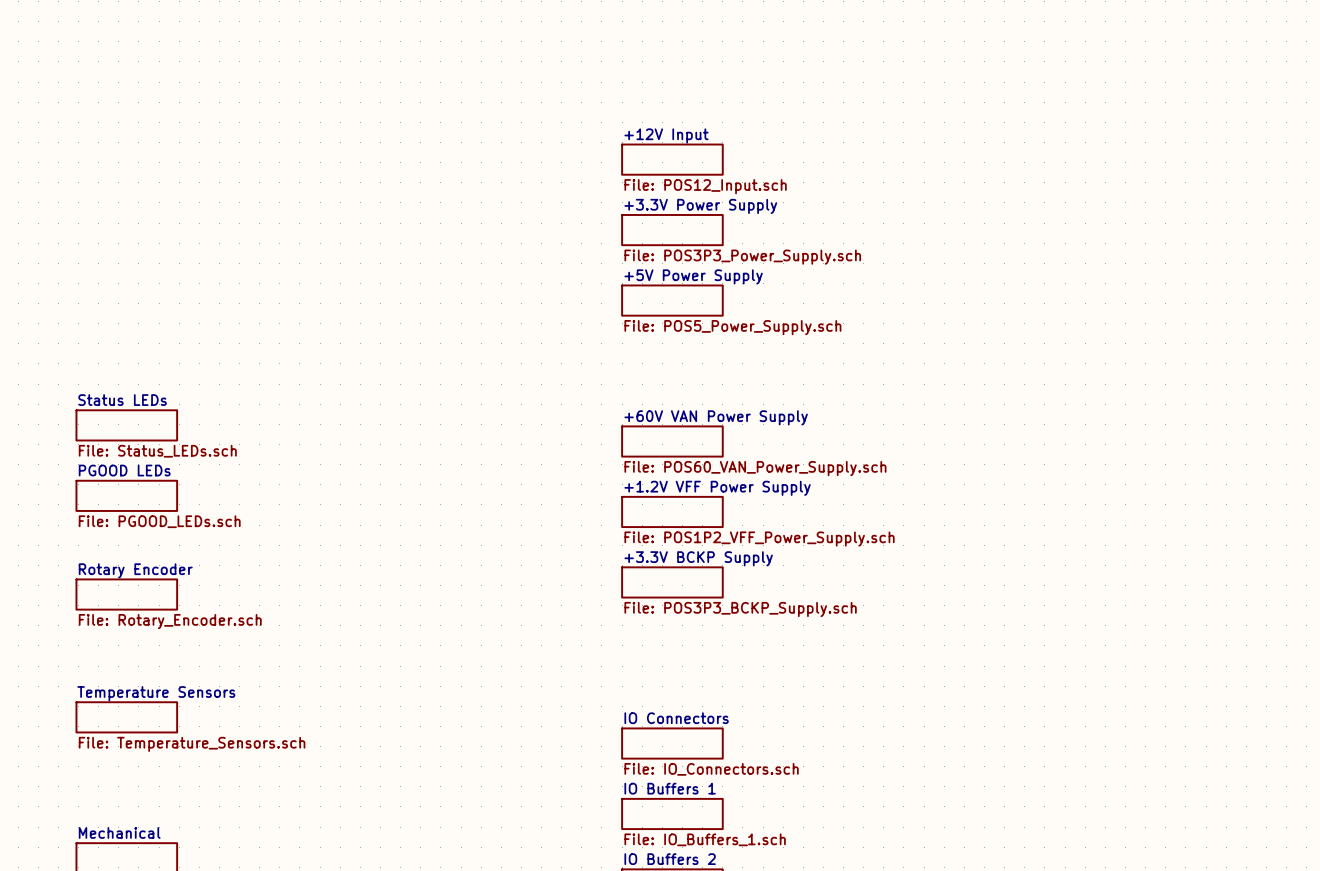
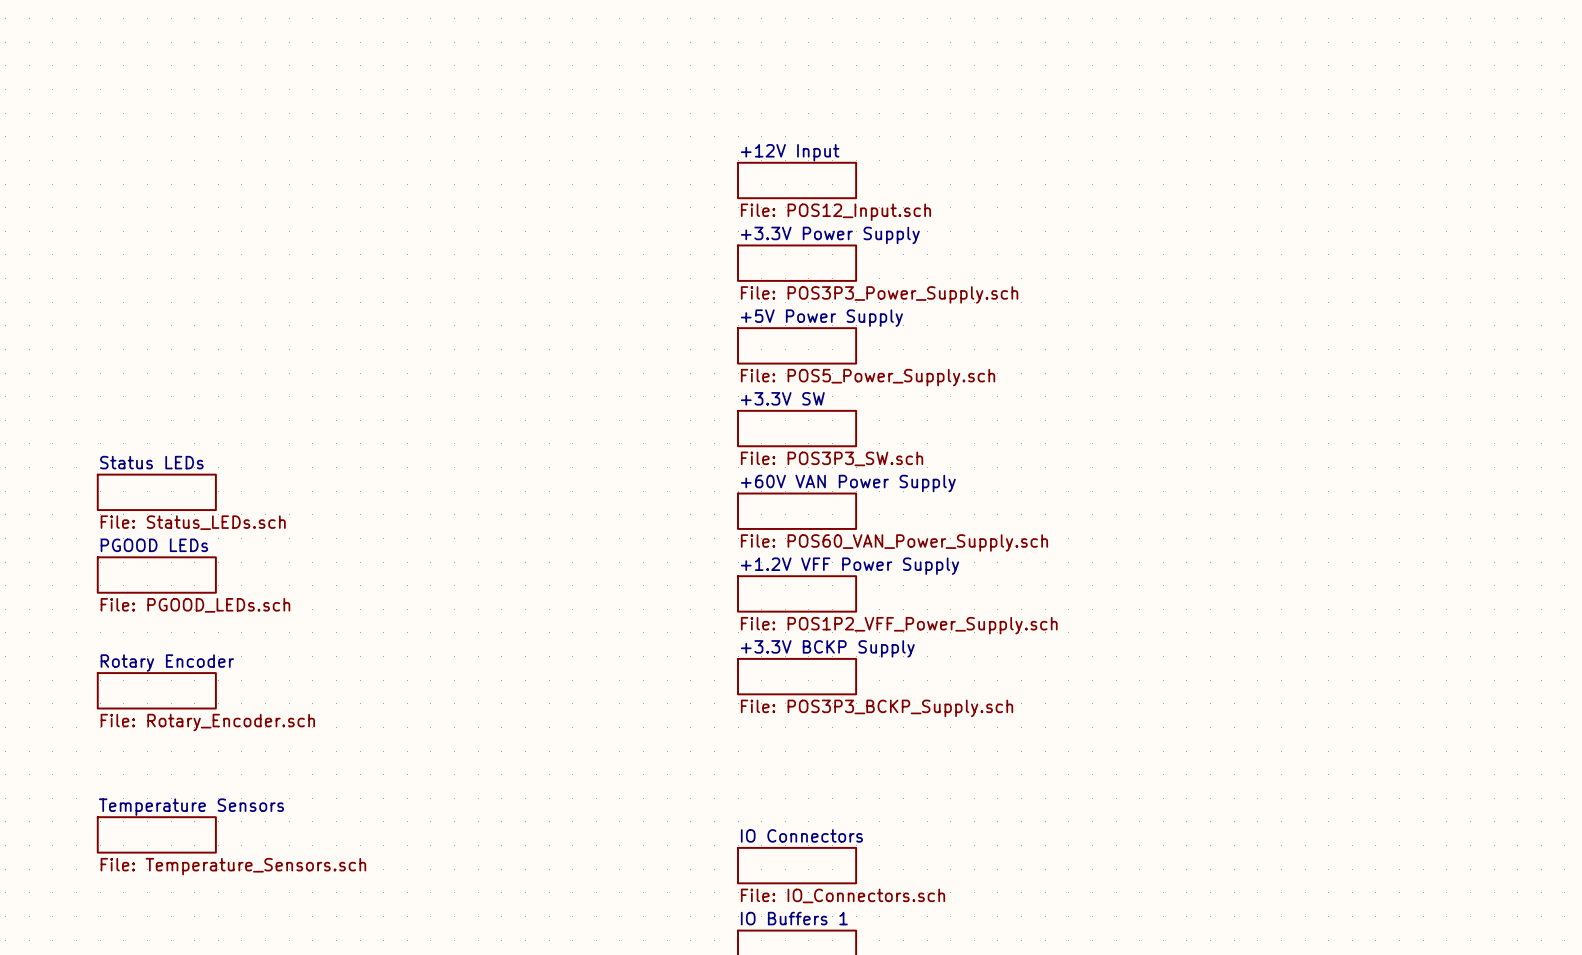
sheet +3.3V SW: none -> File: POS3P3_SW.sch (797, 428)

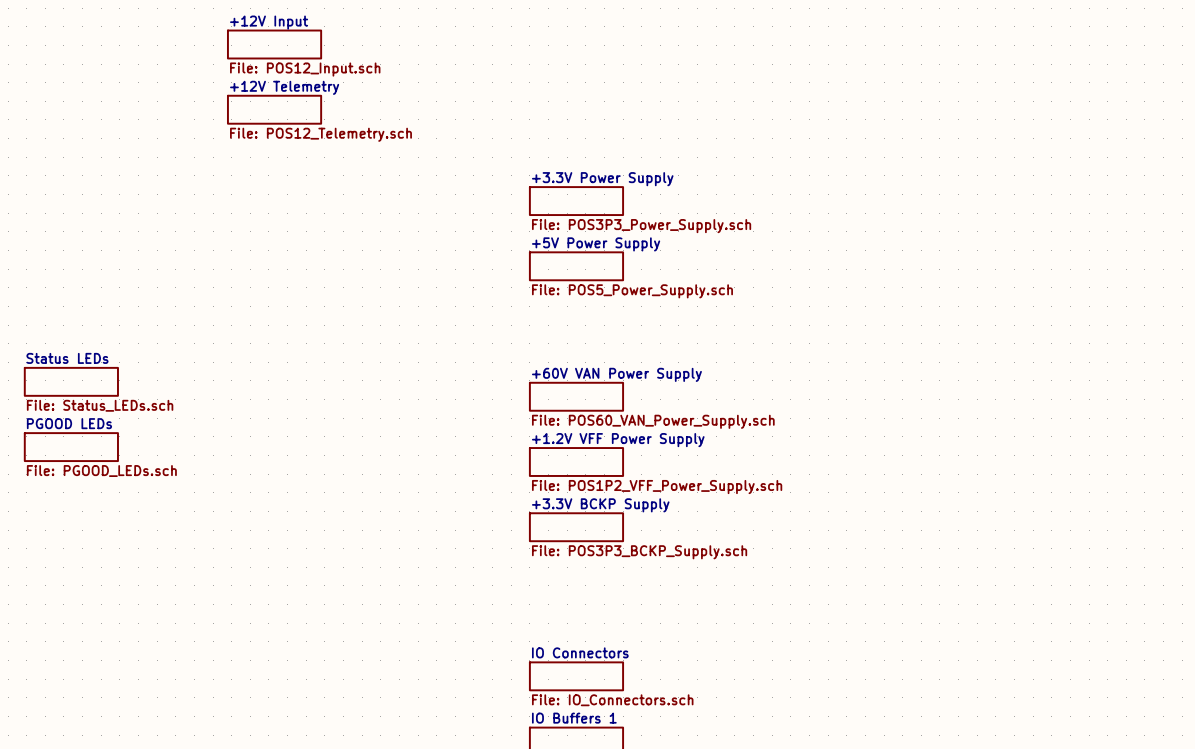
sheet +12V Telemetry: none -> File: POS12_Telemetry.sch (274, 109)
sheet +12V Input position: (797, 180) -> (274, 44)
sheet +3.3V SW: File: POS3P3_SW.sch (797, 428) -> none
sheet Rotary Encoder: File: Rotary_Encoder.sch (156, 690) -> none
sheet Temperature Sensors: File: Temperature_Sensors.sch (156, 834) -> none

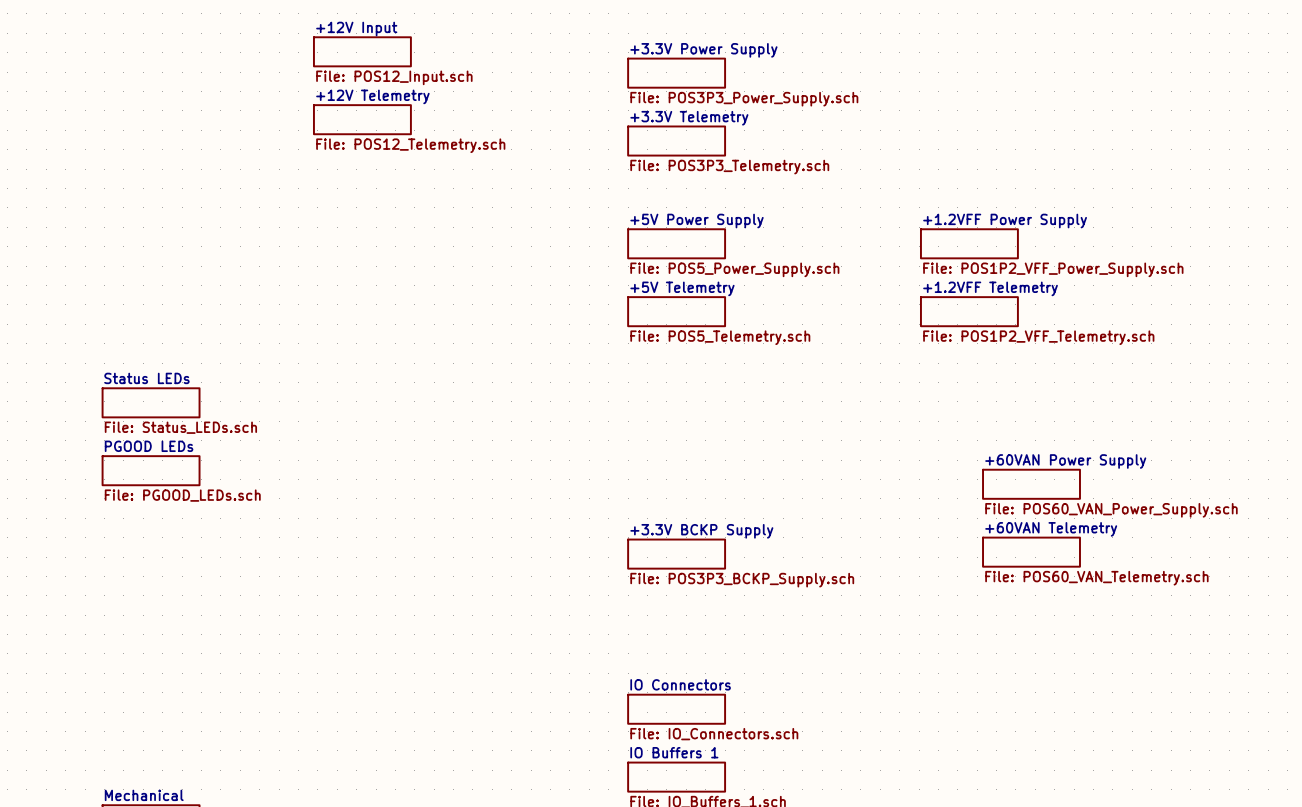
sheet +3.3V Telemetry: none -> File: POS3P3_Telemetry.sch (676, 141)
sheet +3.3V Power Supply position: (576, 201) -> (676, 73)
sheet +1.2VFF Power Supply: none -> File: POS1P2_VFF_Power_Supply.sch (969, 243)
sheet +5V Power Supply position: (576, 266) -> (676, 243)
sheet +5V Telemetry: none -> File: POS5_Telemetry.sch (676, 311)
sheet +1.2VFF Telemetry: none -> File: POS1P2_VFF_Telemetry.sch (969, 311)
sheet +60V VAN Power Supply: File: POS60_VAN_Power_Supply.sch (576, 396) -> none
sheet +60VAN Power Supply: none -> File: POS60_VAN_Power_Supply.sch (1031, 484)
sheet +1.2V VFF Power Supply: File: POS1P2_VFF_Power_Supply.sch (576, 462) -> none
sheet +60VAN Telemetry: none -> File: POS60_VAN_Telemetry.sch (1031, 552)

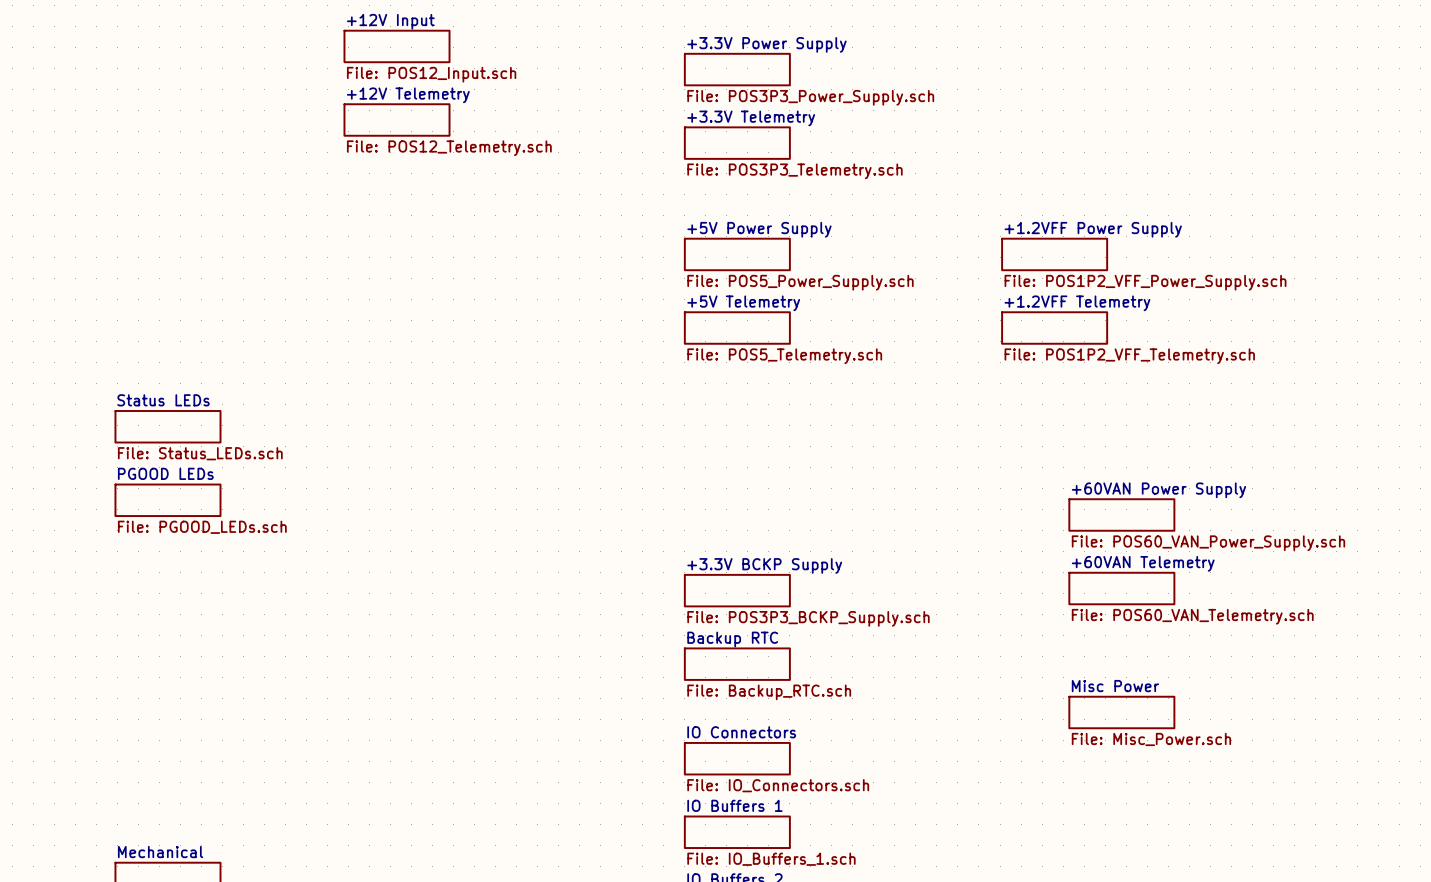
sheet Backup RTC: none -> File: Backup_RTC.sch (737, 664)
sheet Misc Power: none -> File: Misc_Power.sch (1121, 712)

